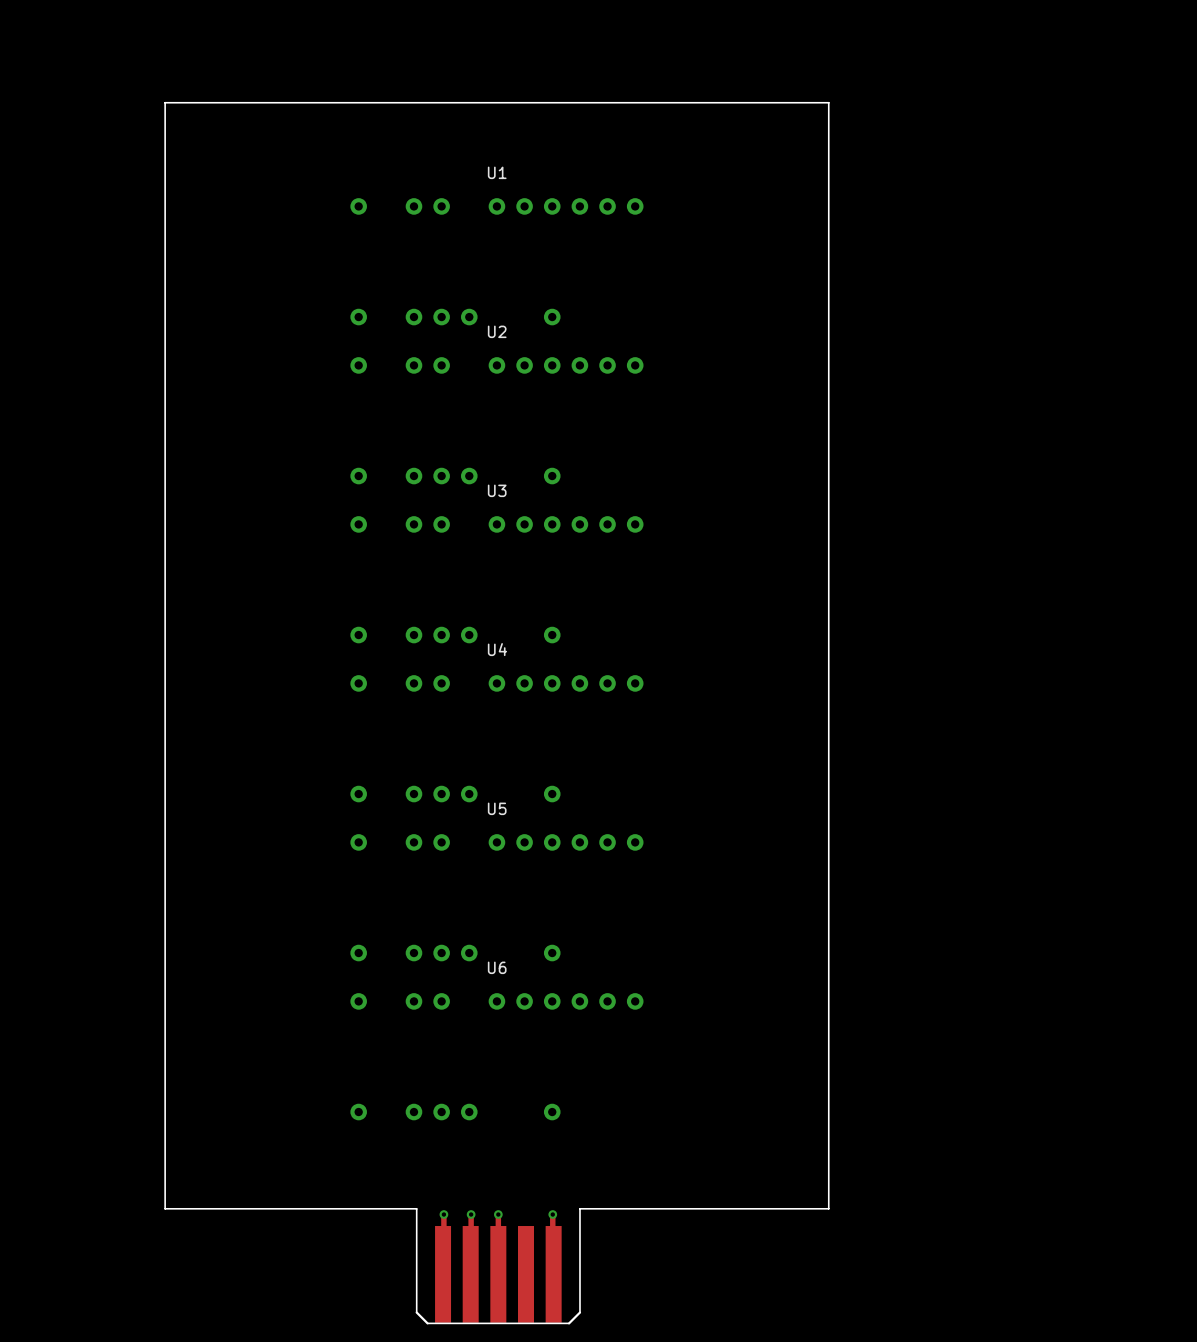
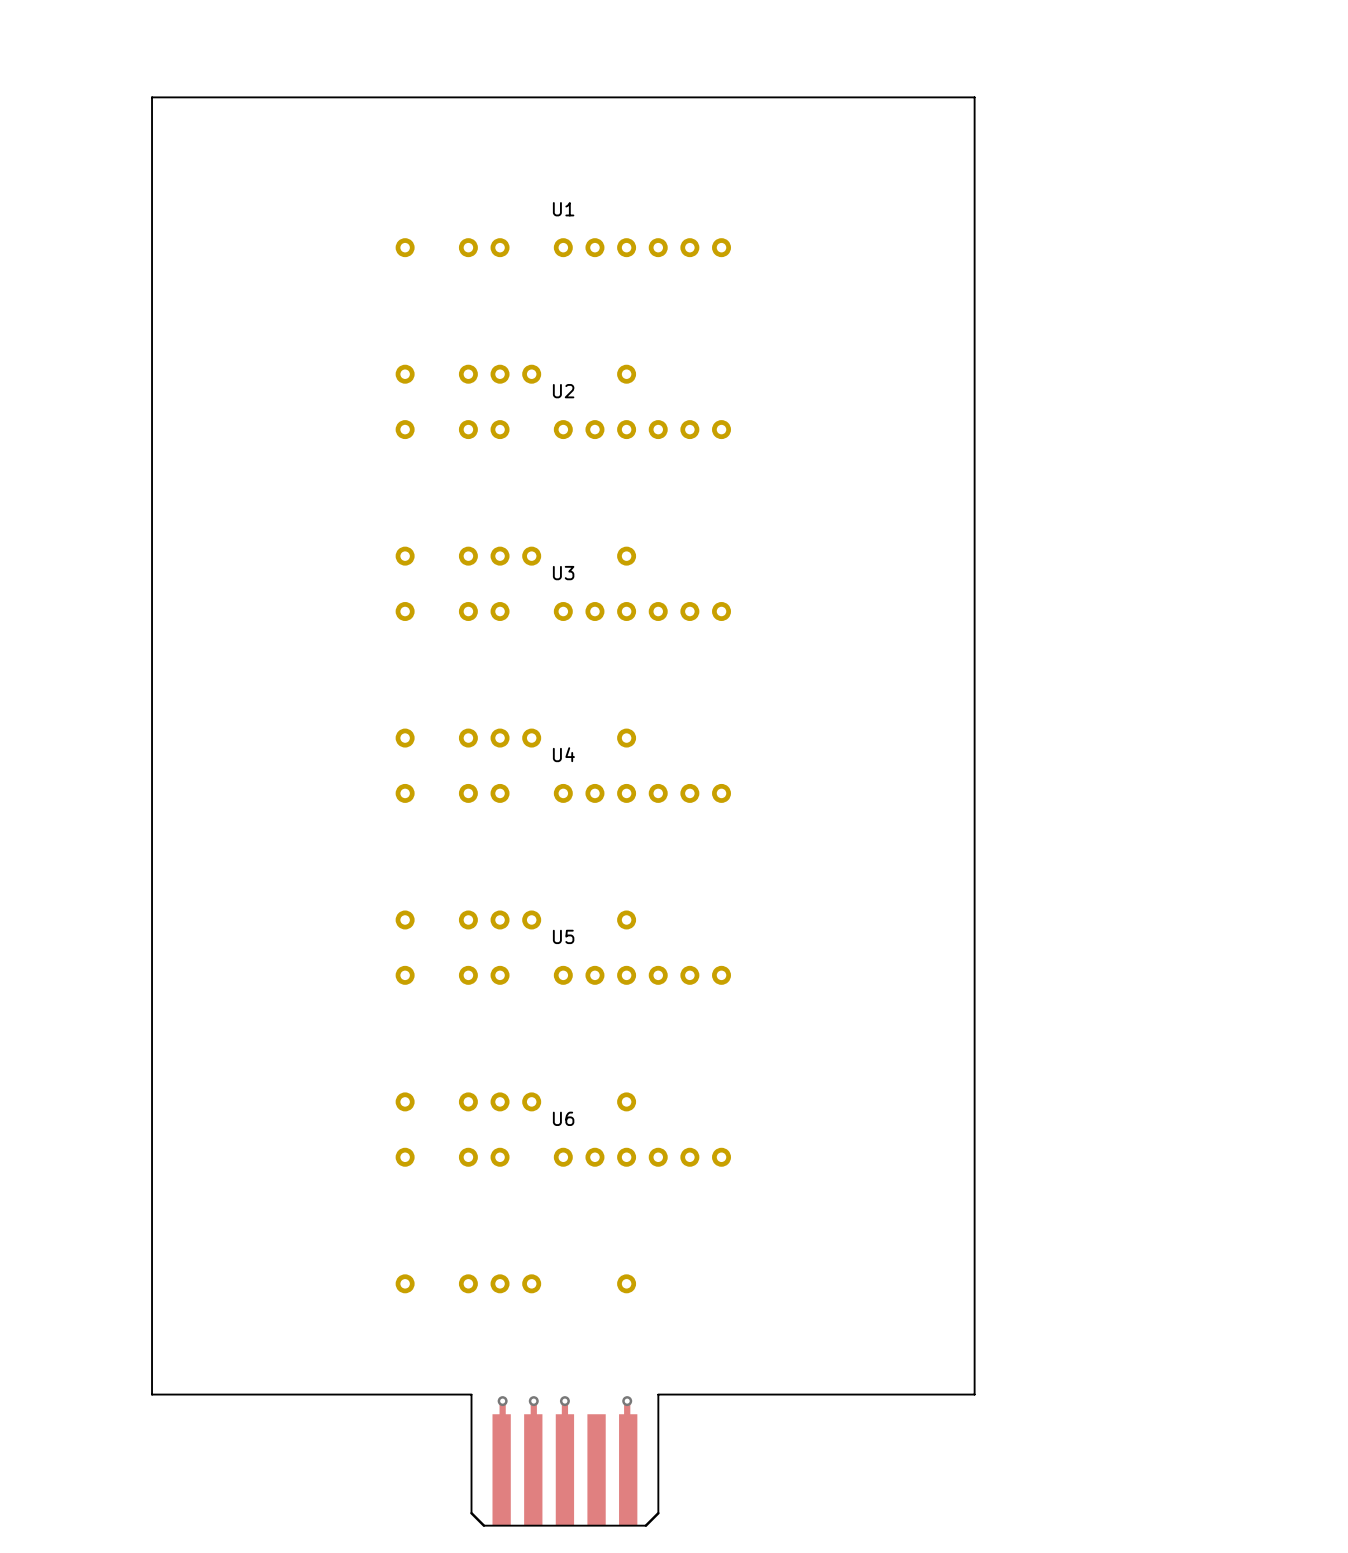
board edge: (165, 1208) (165, 102) (828, 102) (828, 1208) -> (183, 1394) (152, 1394) (152, 97) (974, 97) (974, 1394) (942, 1394)

